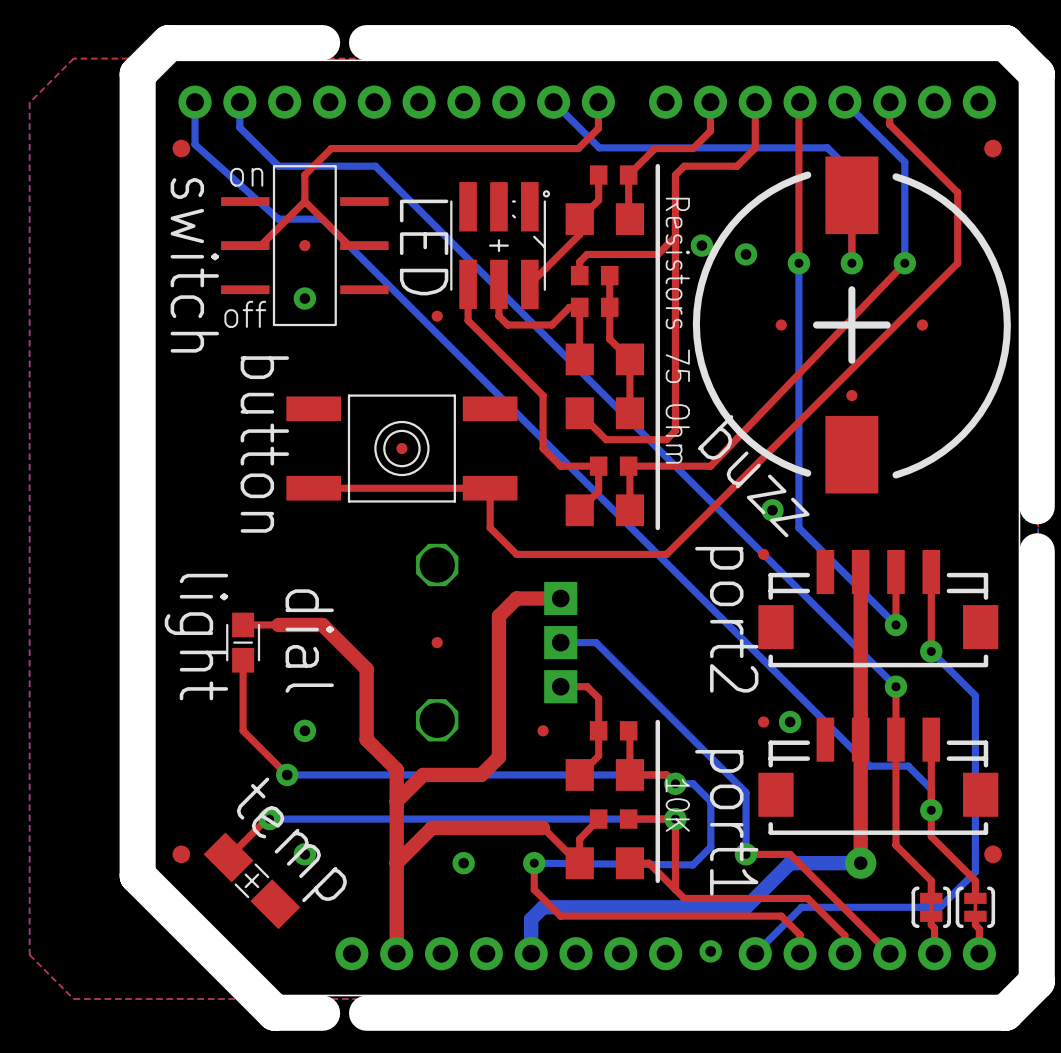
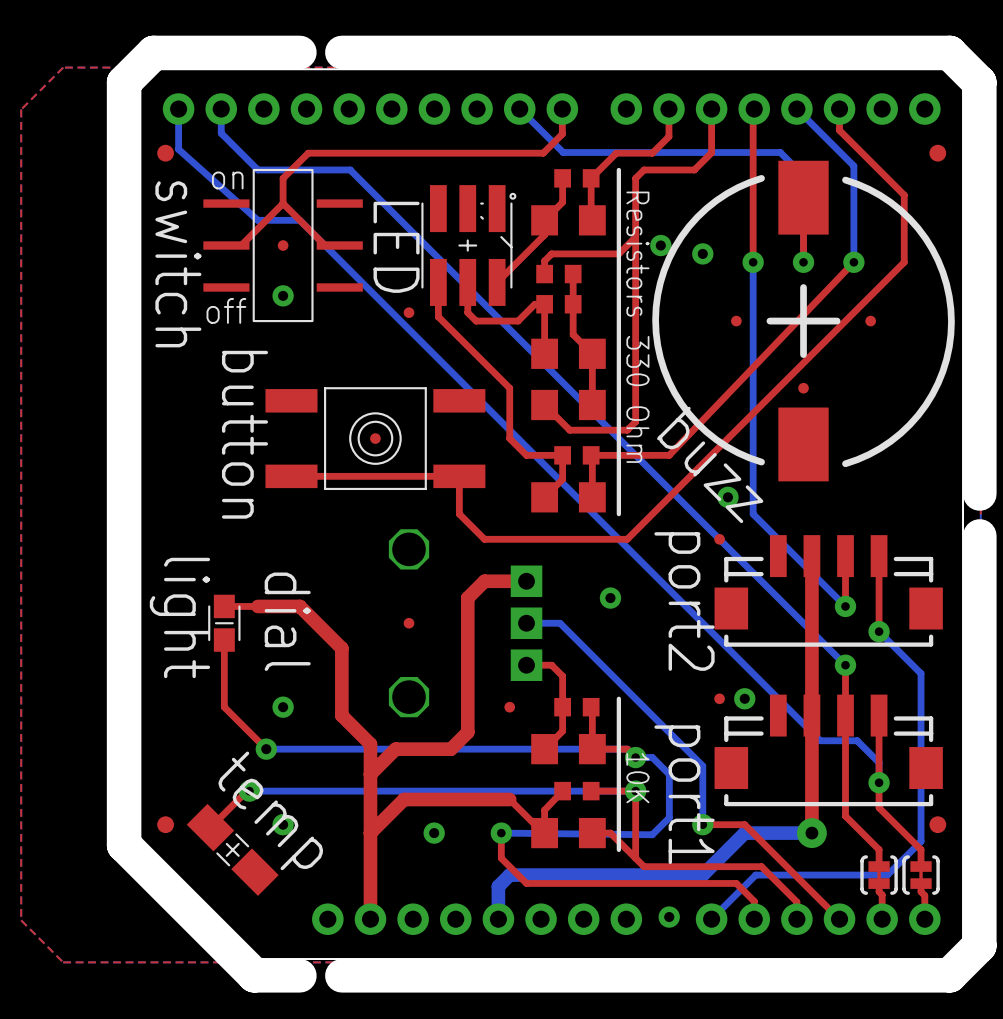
text: Resistors 75 Ohm (677, 330) -> Resistors 330 Ohm (637, 327)
via: none -> (610, 598)

